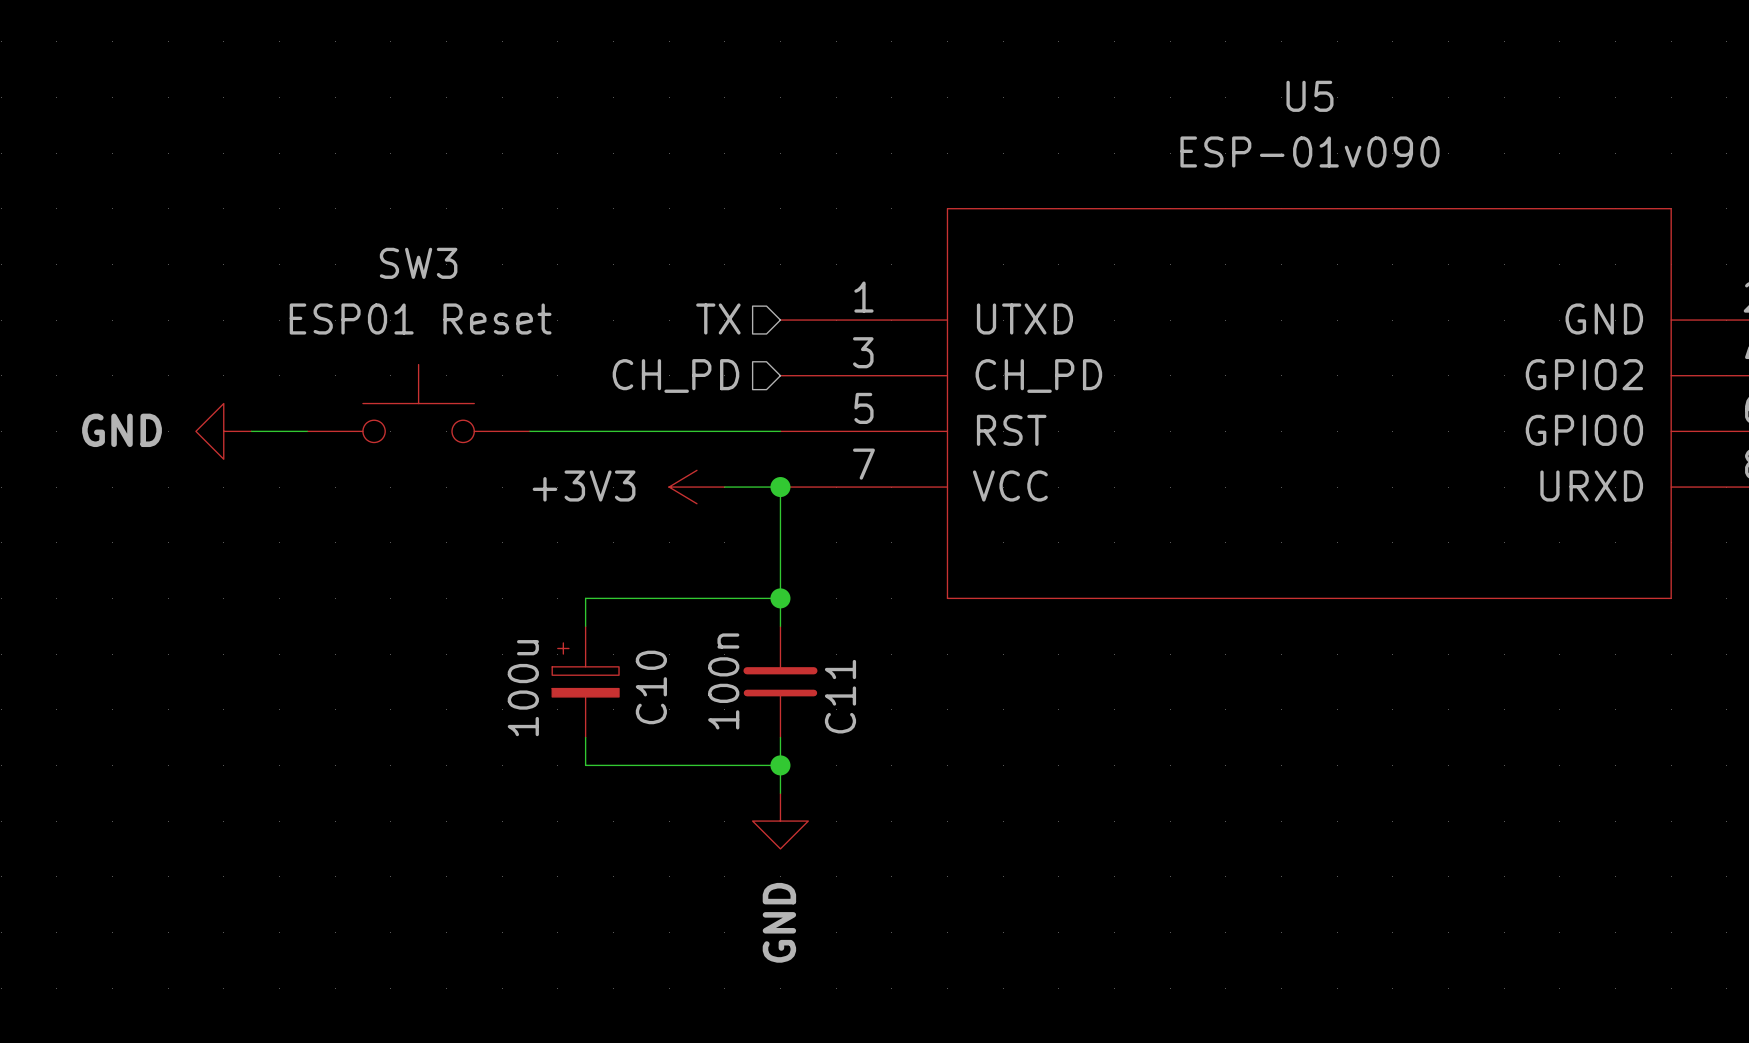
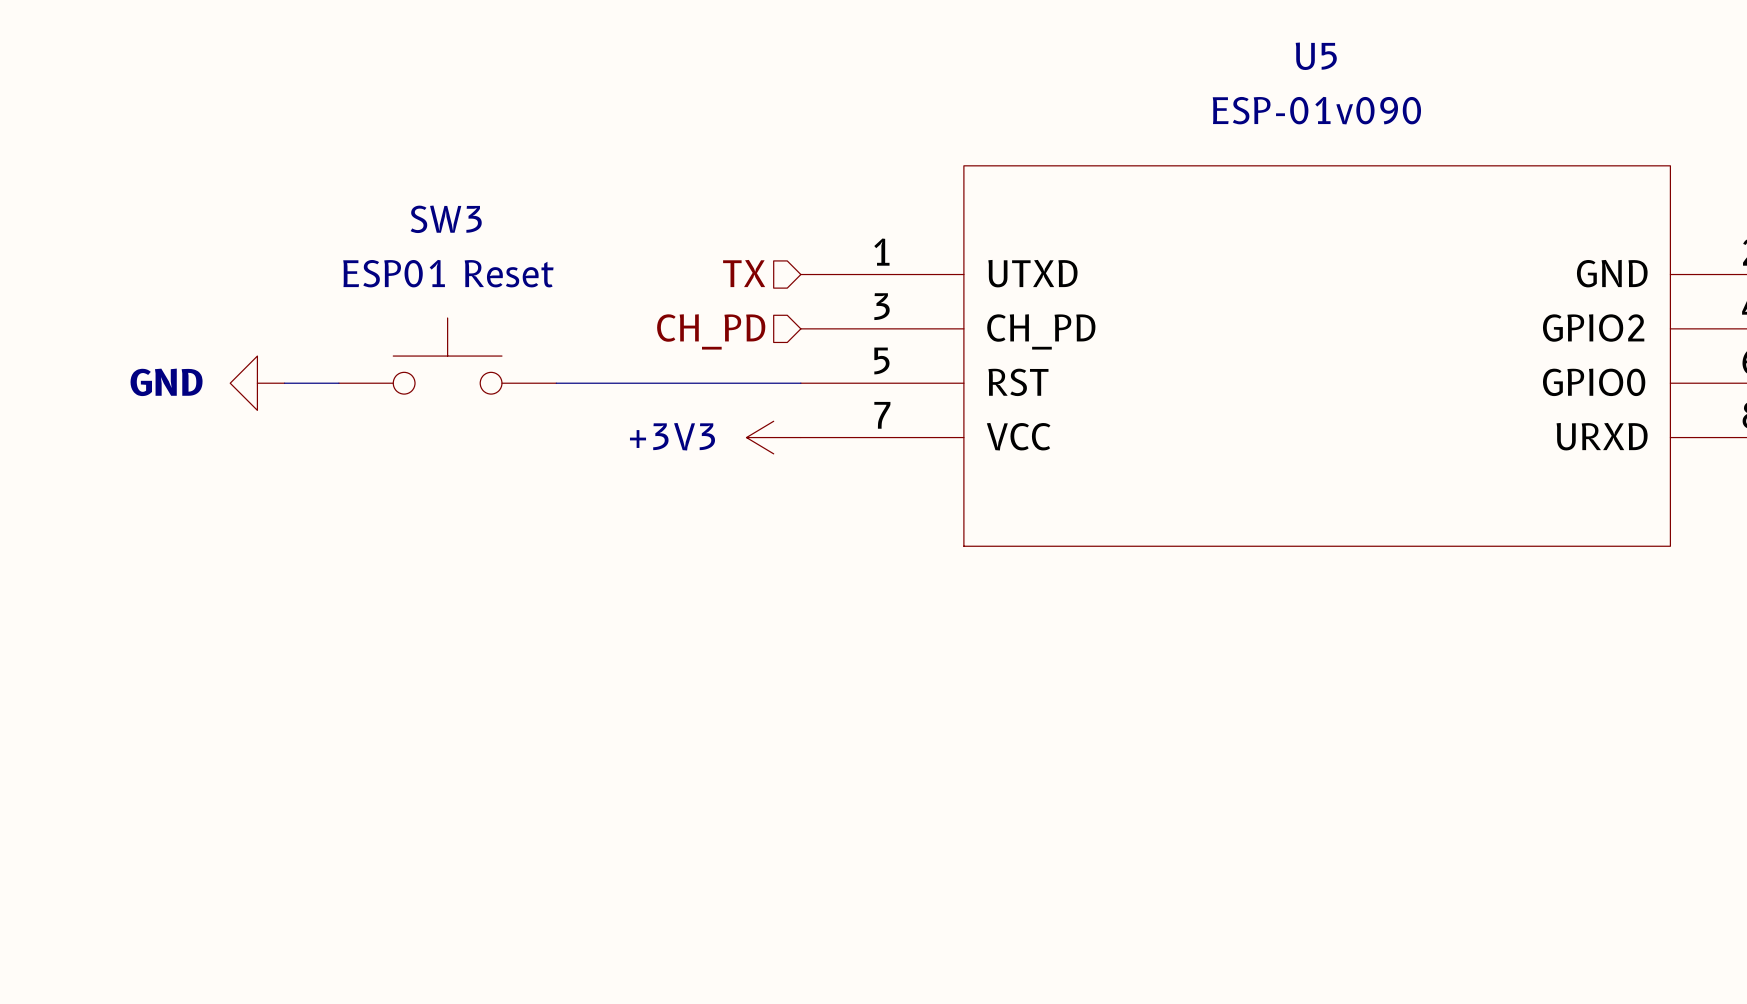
power symbol position: +3V3 (696, 487) -> +3V3 (773, 437)
wire: (724, 487) (780, 487) (780, 626) -> none
junction: (780, 487) -> none
wire: (780, 598) (585, 598) (585, 626) -> none
junction: (780, 598) -> none
C10: 100u (585, 681) -> none
C11: 100n (780, 681) -> none
wire: (585, 737) (585, 765) (780, 765) -> none
wire: (780, 737) (780, 793) -> none
junction: (780, 765) -> none
power symbol: GND (780, 821) -> none

